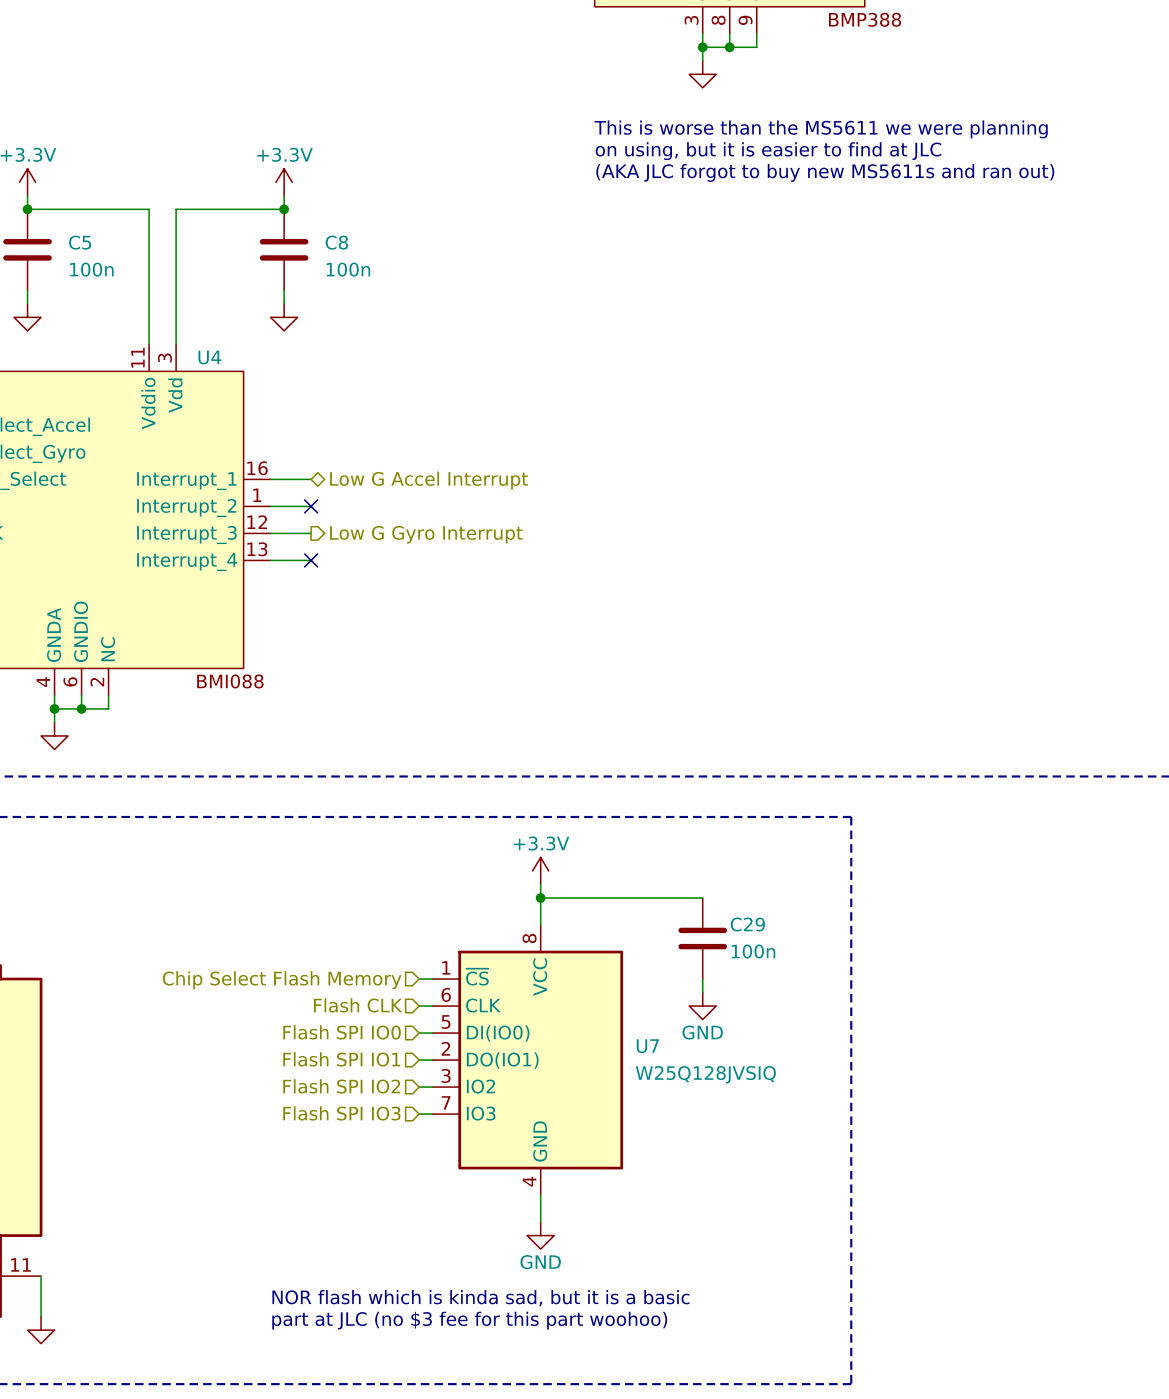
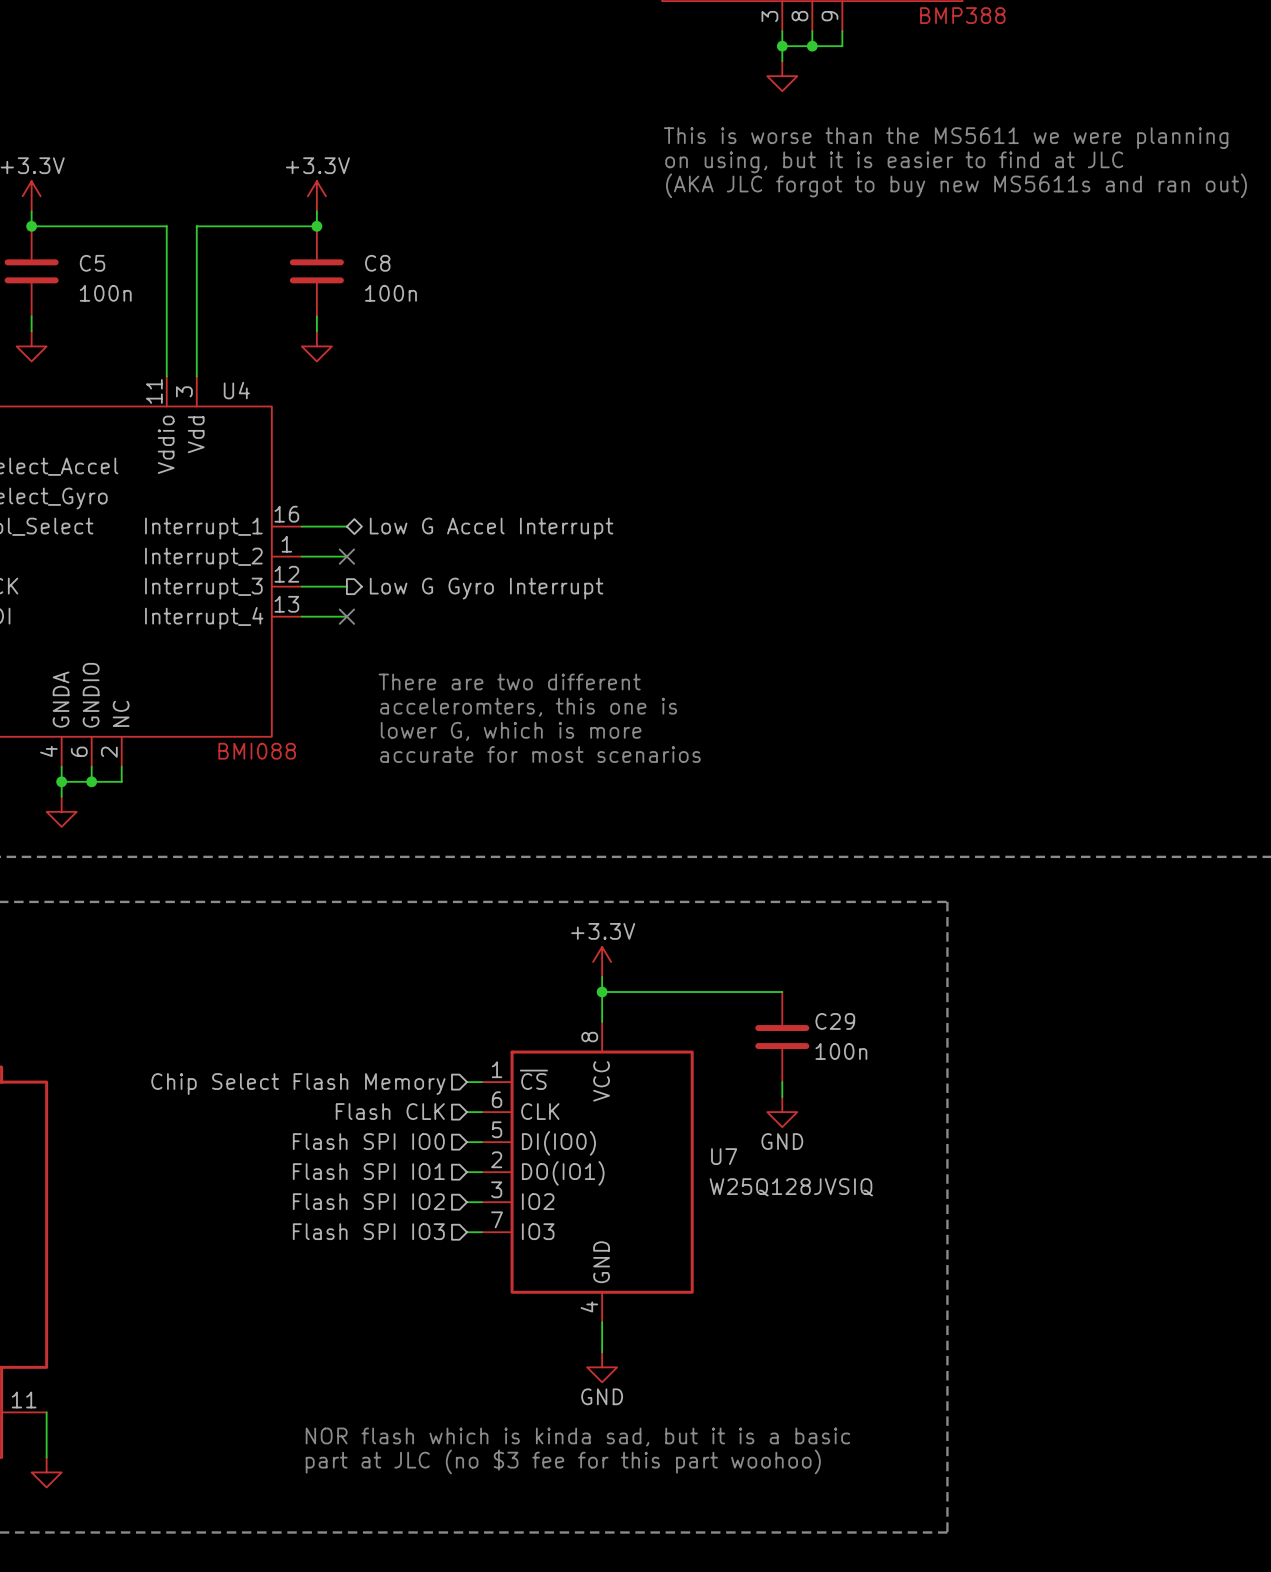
text: none -> There are two different (509, 681)
text: none -> acceleromters, this one is (528, 707)
text: none -> lower G, which is more (511, 731)
text: none -> accurate for most scenarios (540, 754)

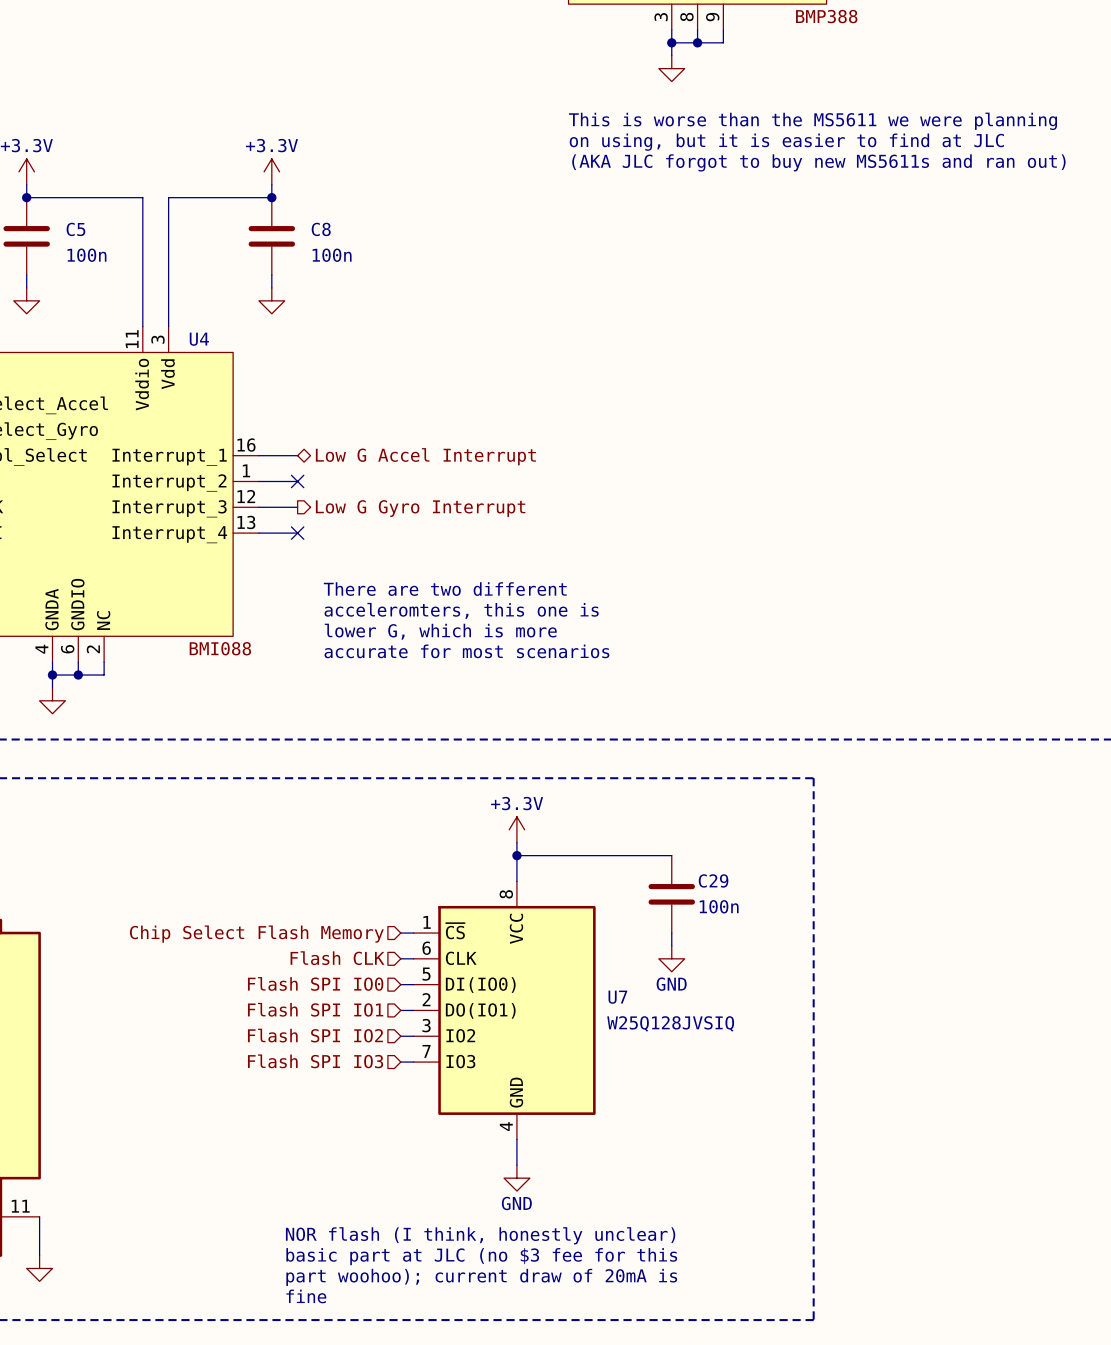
text: none -> NOR flash (I think, honestly unclear) (480, 1235)
text: NOR flash which is kinda sad, but it is a basic (577, 1437) -> none
text: part at JLC (no $3 fee for this part woohoo) (563, 1461) -> basic part at JLC (no $3 fee for this (481, 1256)
text: none -> part woohoo); current draw of 20mA is (481, 1277)
text: none -> fine (306, 1296)

